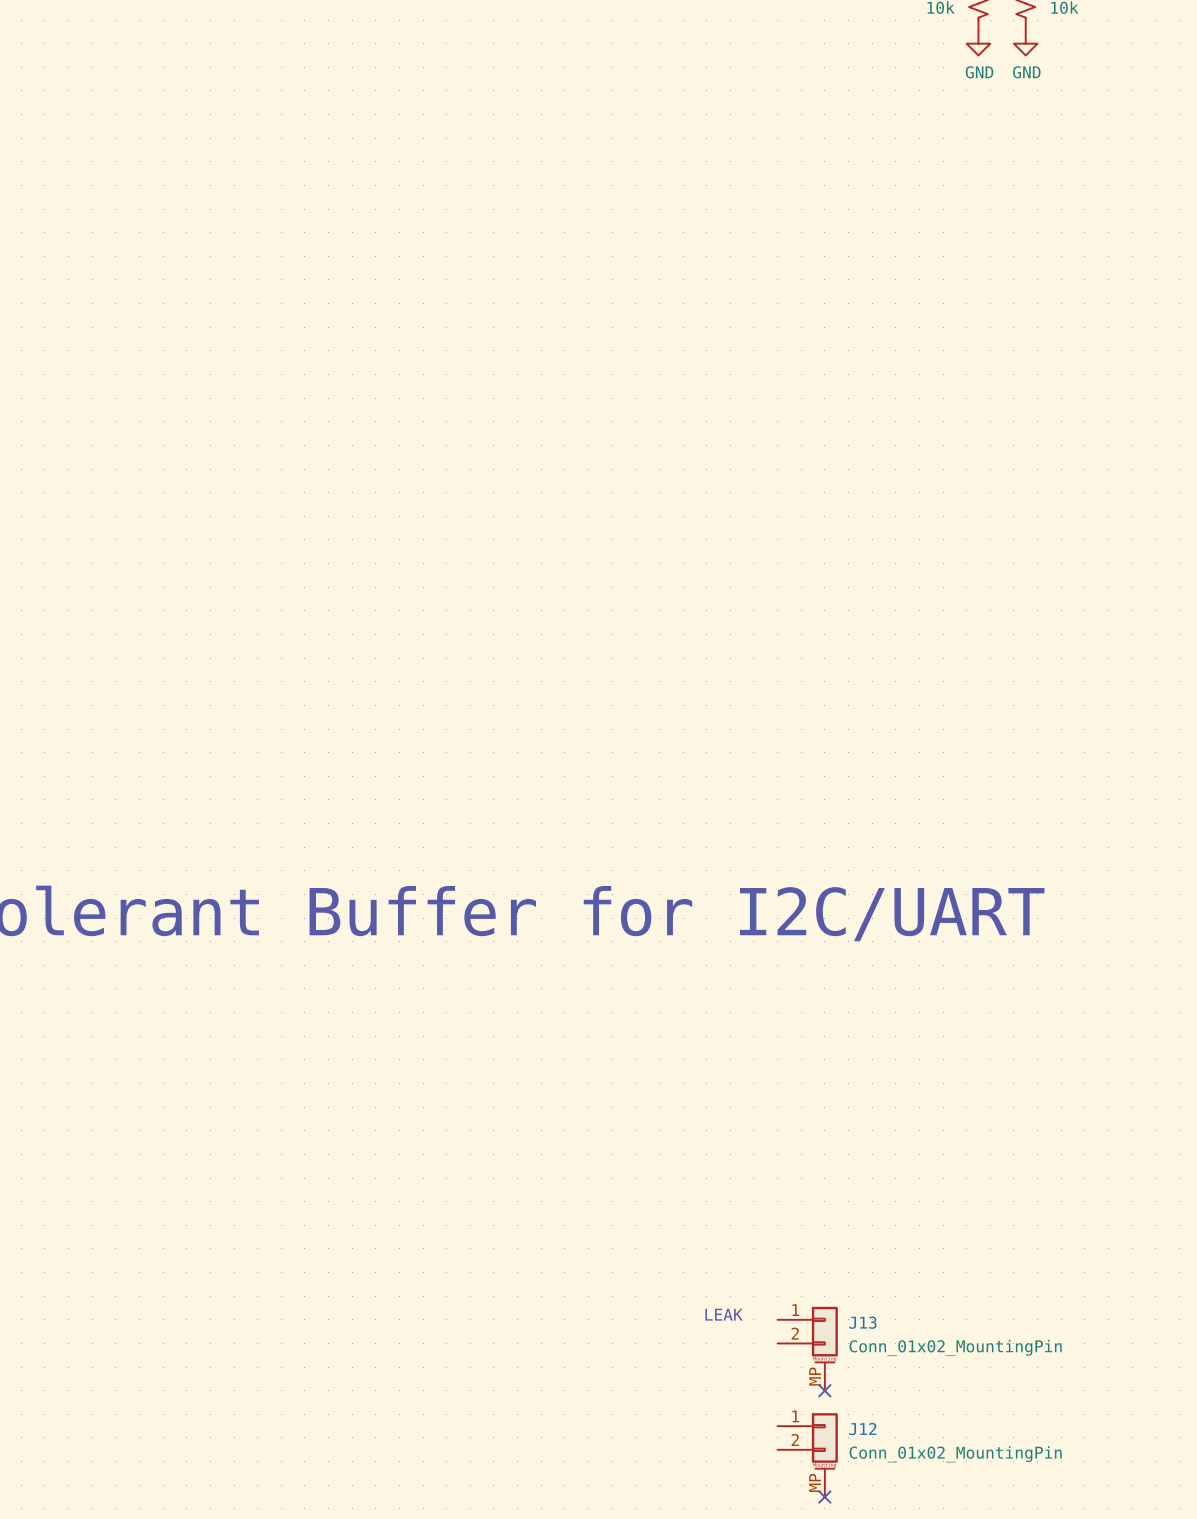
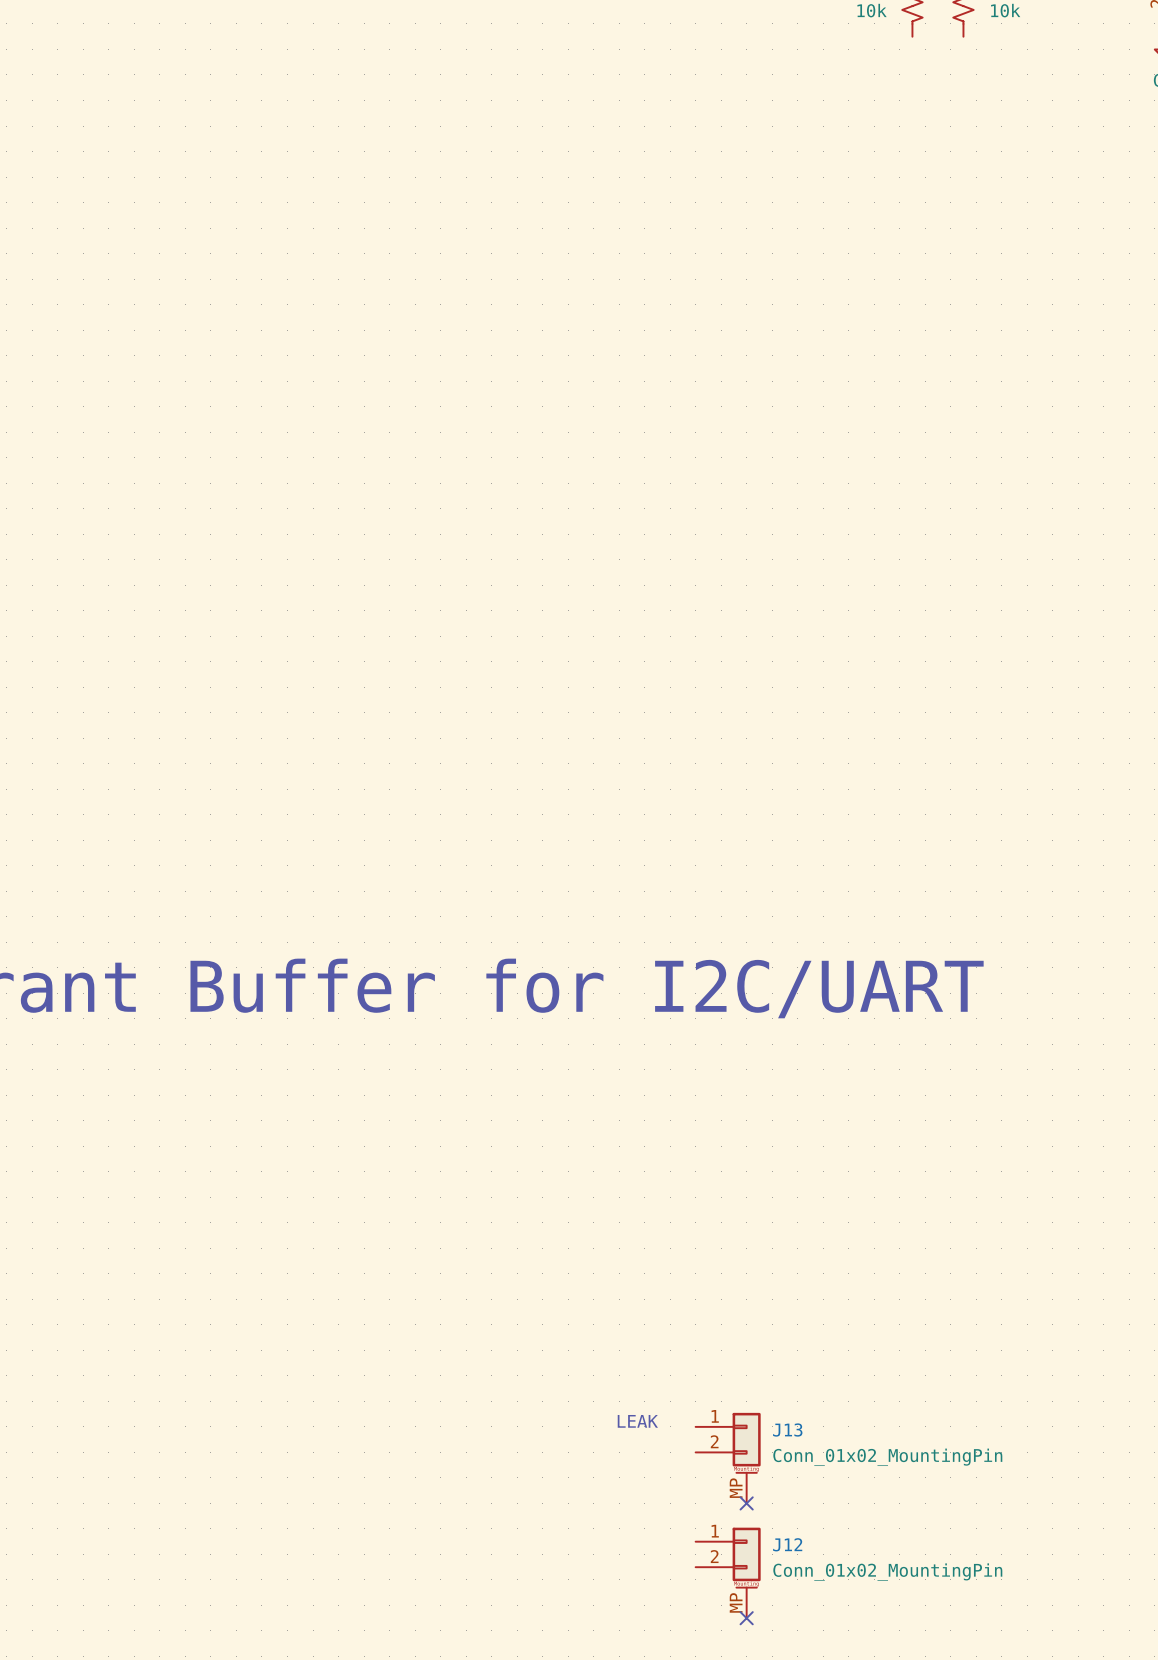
power symbol: GND (978, 43) -> none
power symbol: GND (1025, 43) -> none

